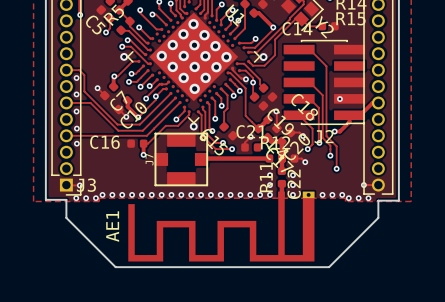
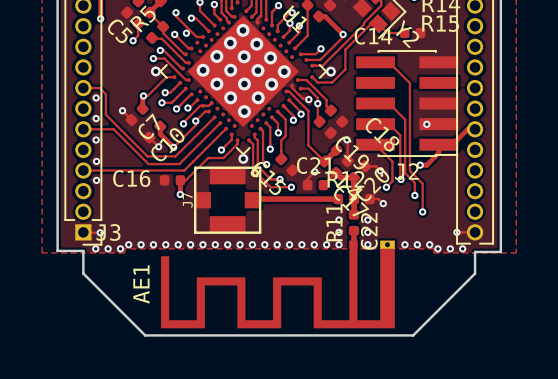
via: none -> (186, 33)

